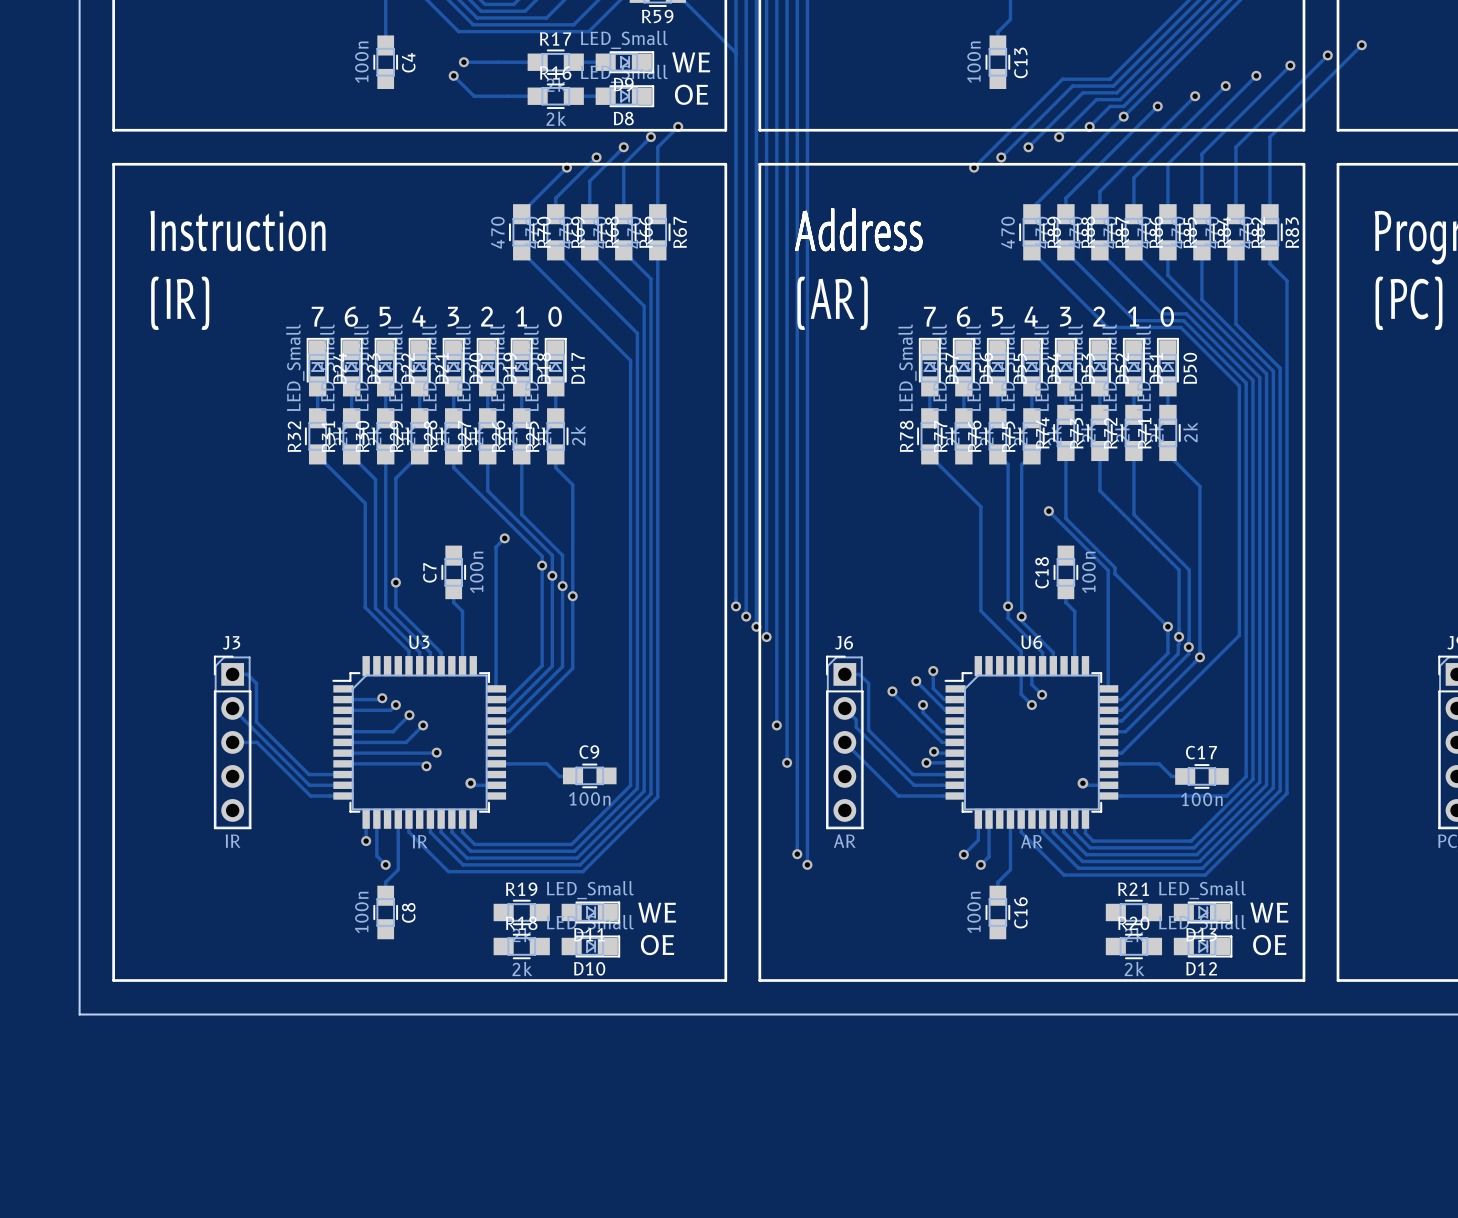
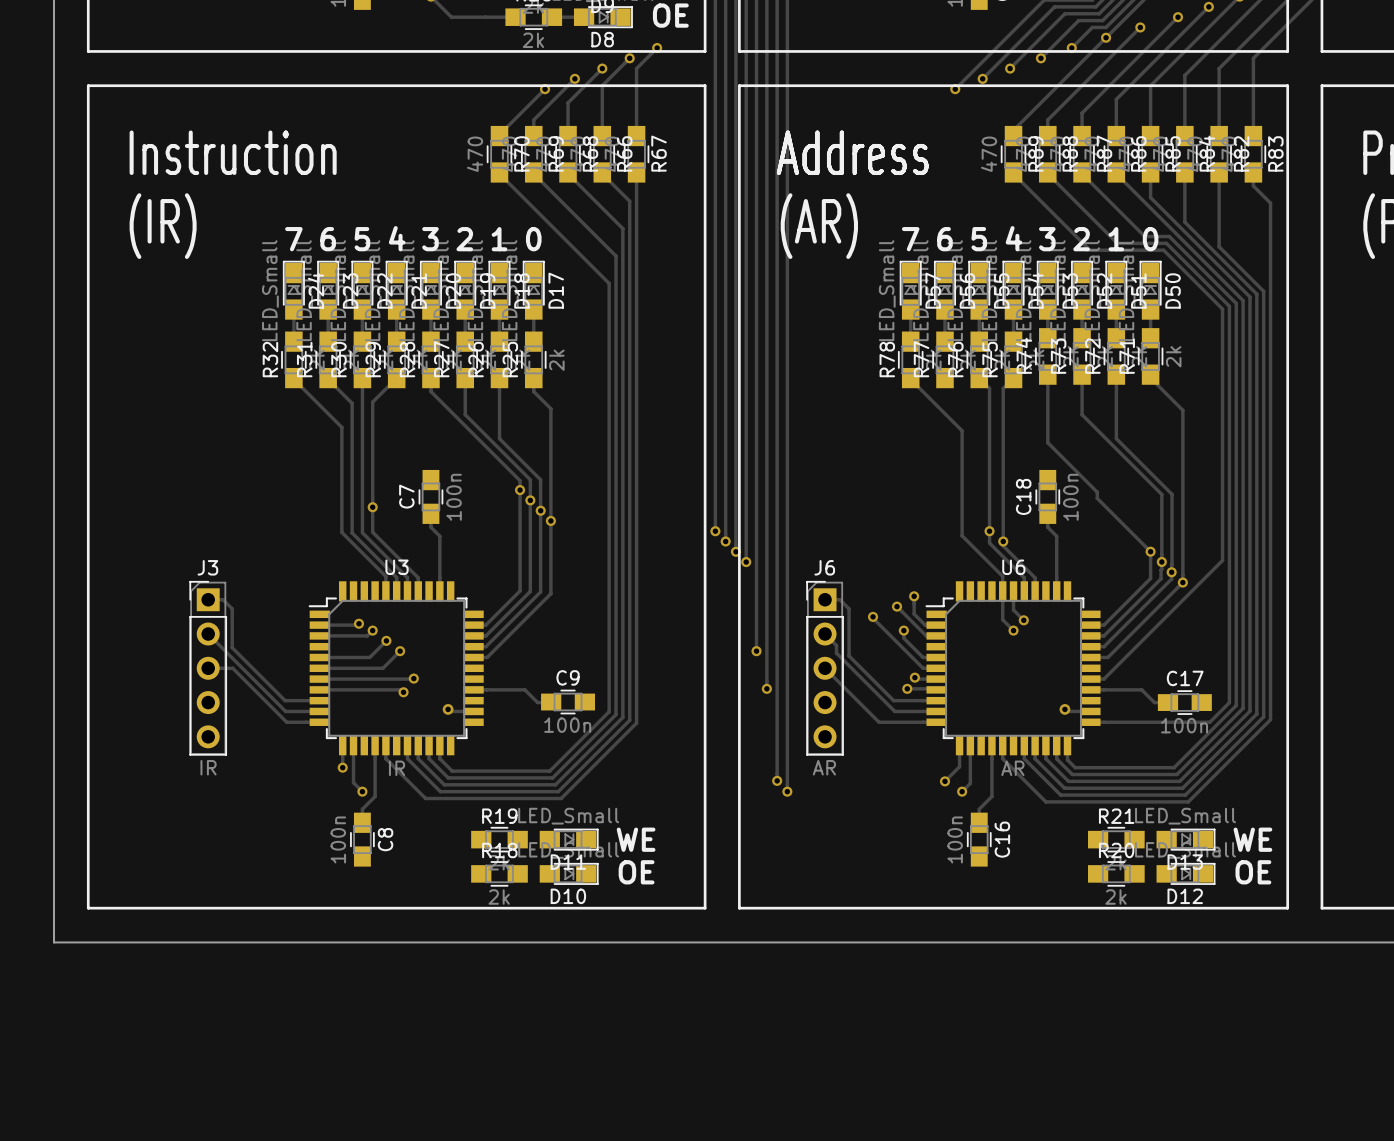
track: (1048, 511) (1108, 570) (1108, 688) -> none
via: (1048, 511) -> none
track: (504, 538) (496, 547) (496, 688) -> none
via: (504, 538) -> none

